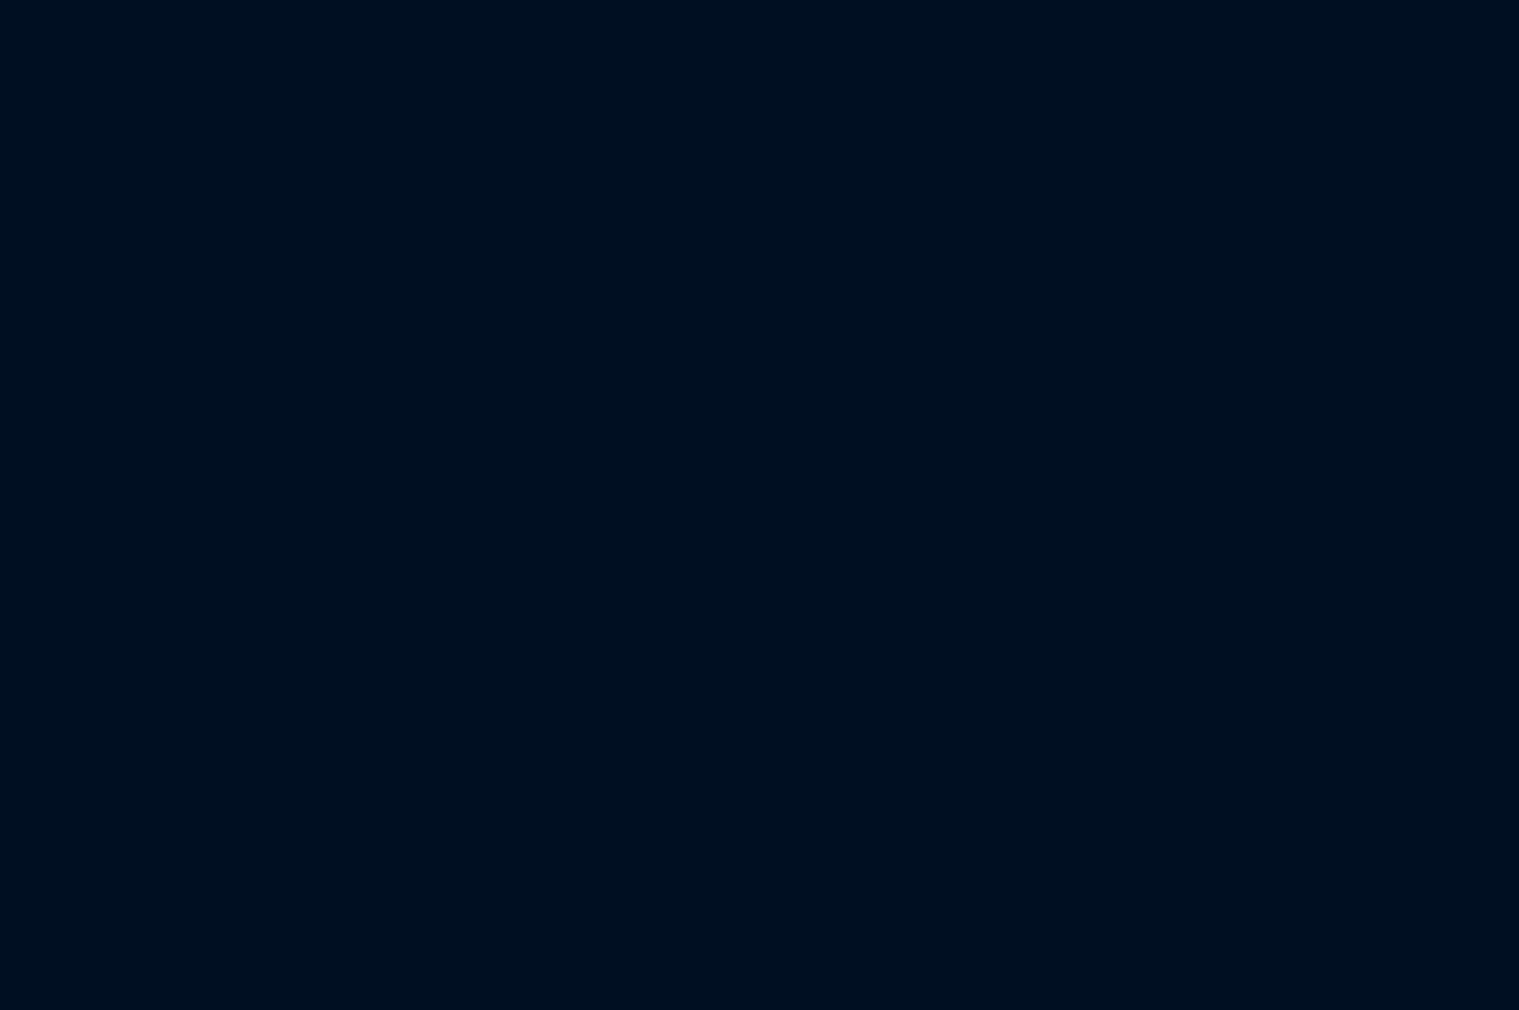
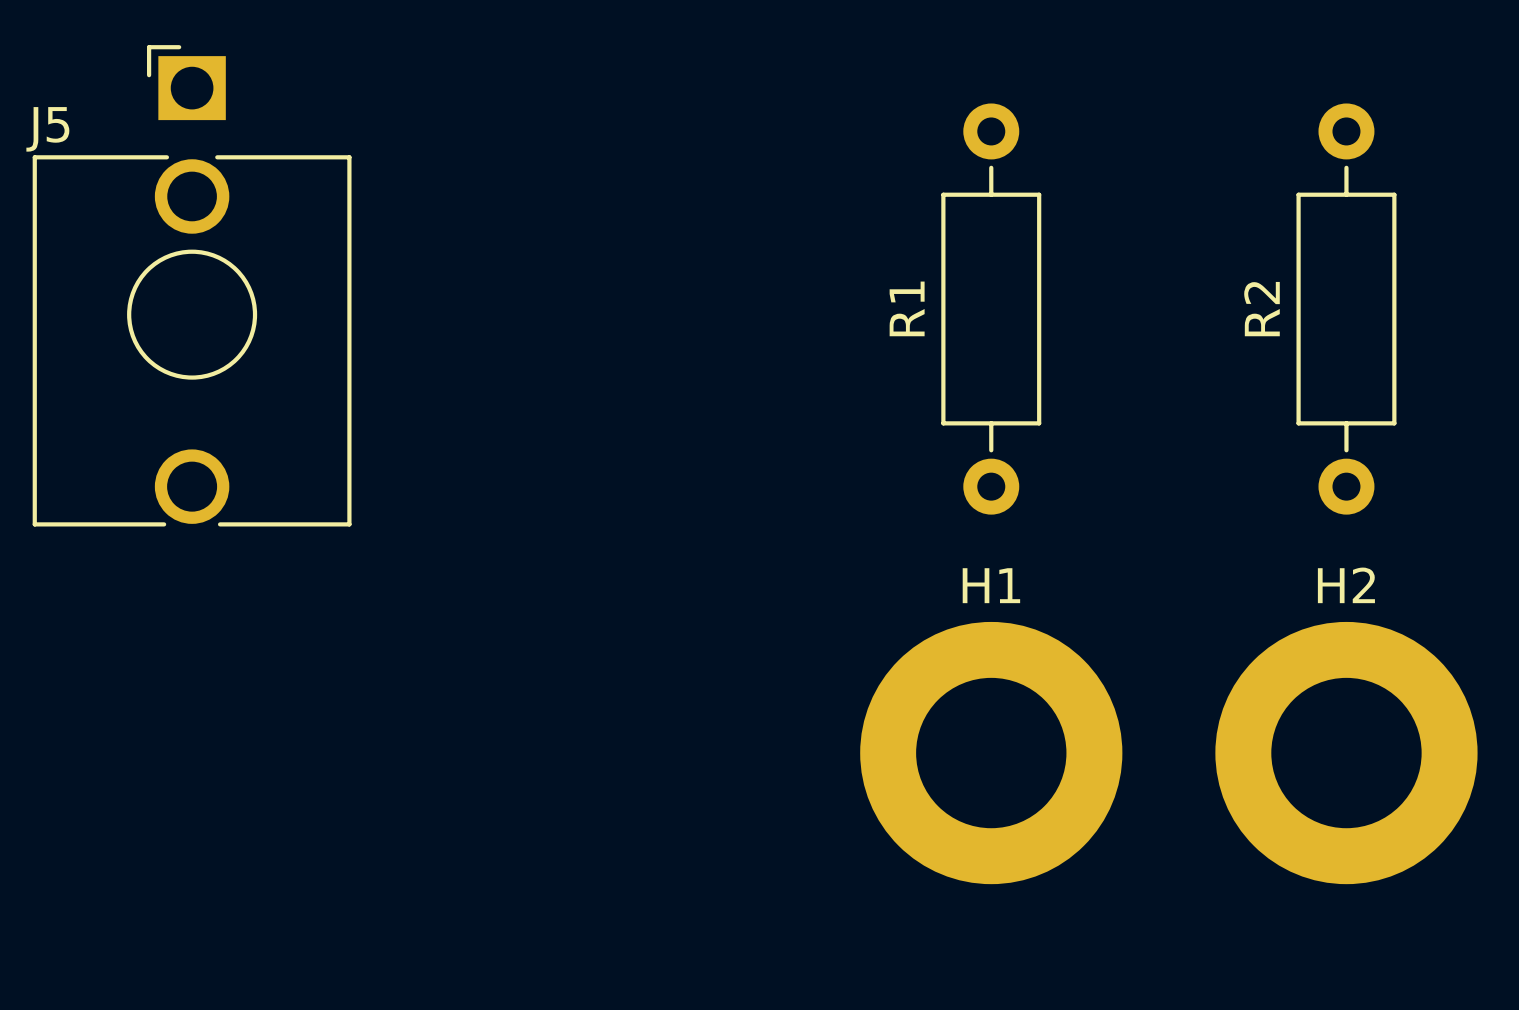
J5: none -> (192, 285)
R1: none -> (991, 309)
R2: none -> (1346, 309)
H1: none -> (991, 753)
H2: none -> (1346, 753)

